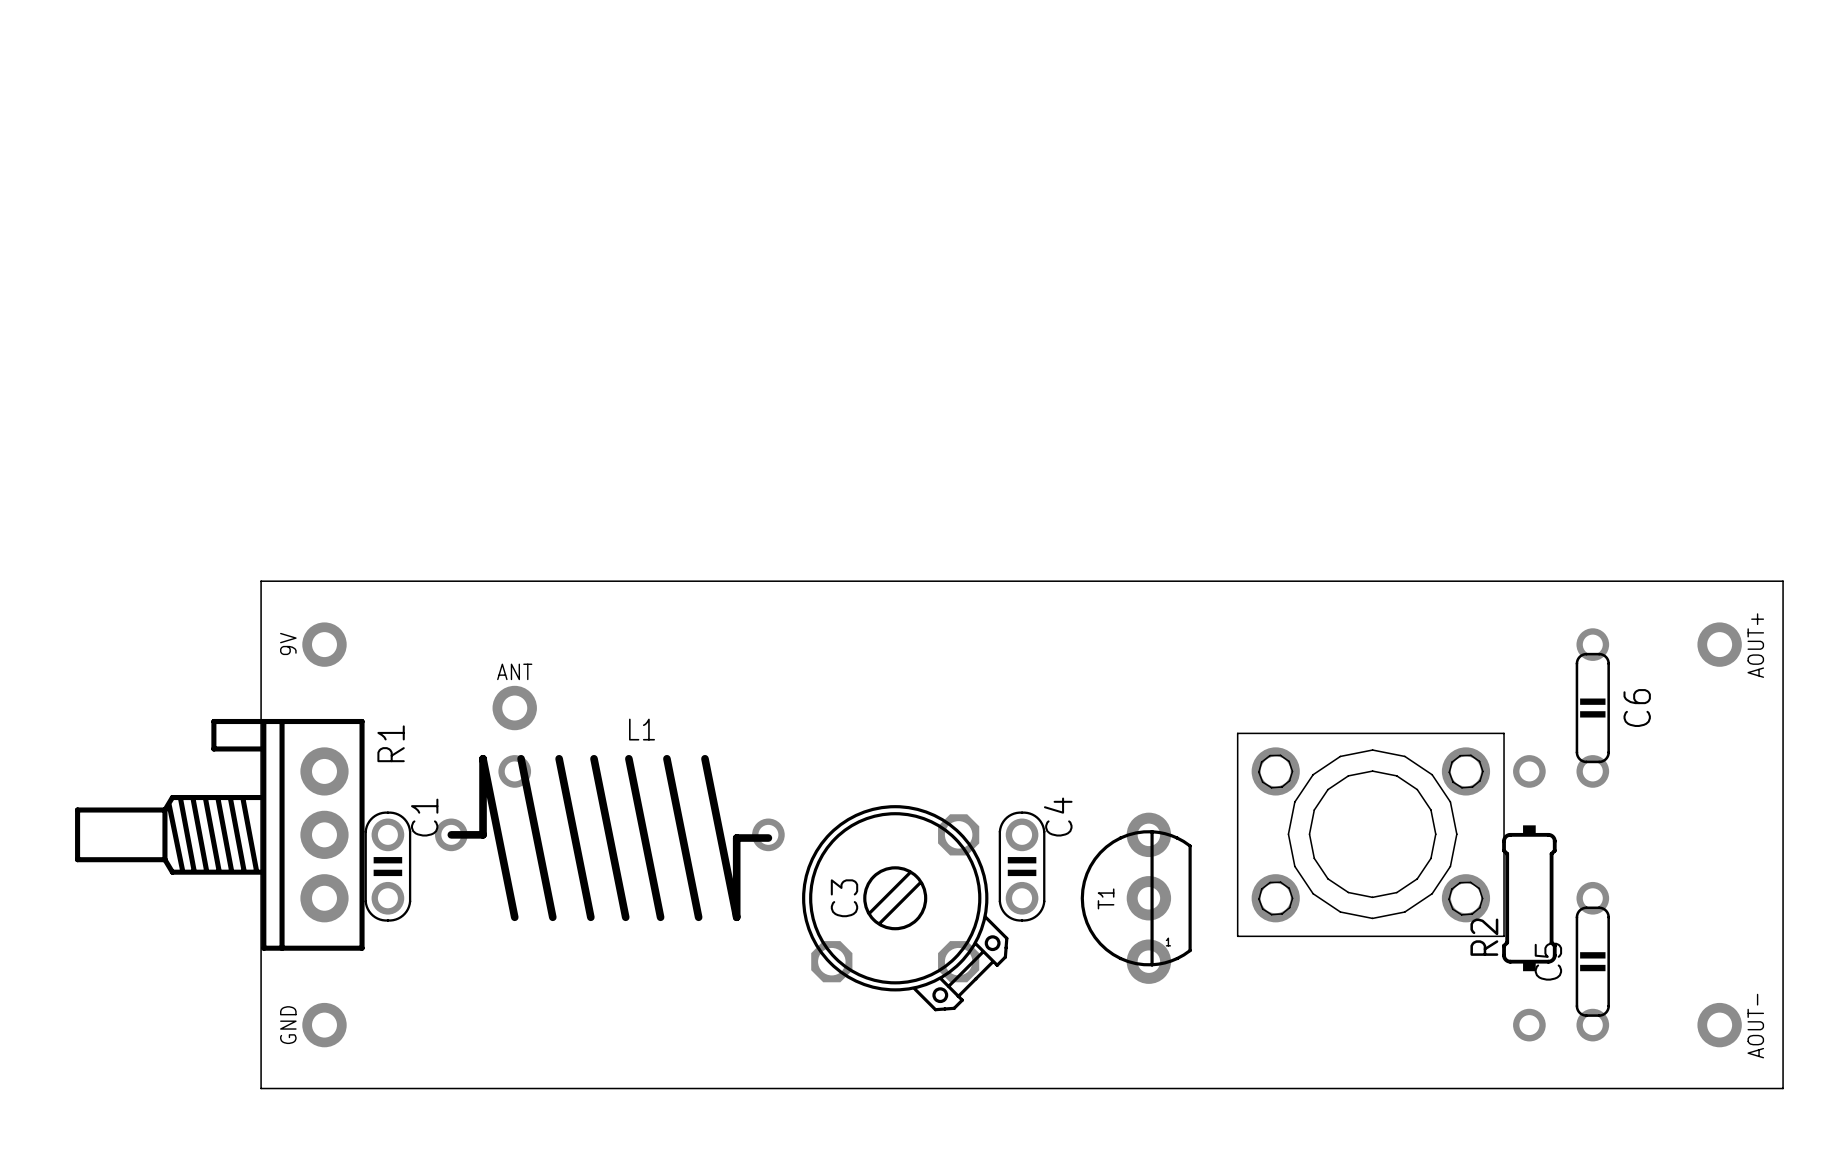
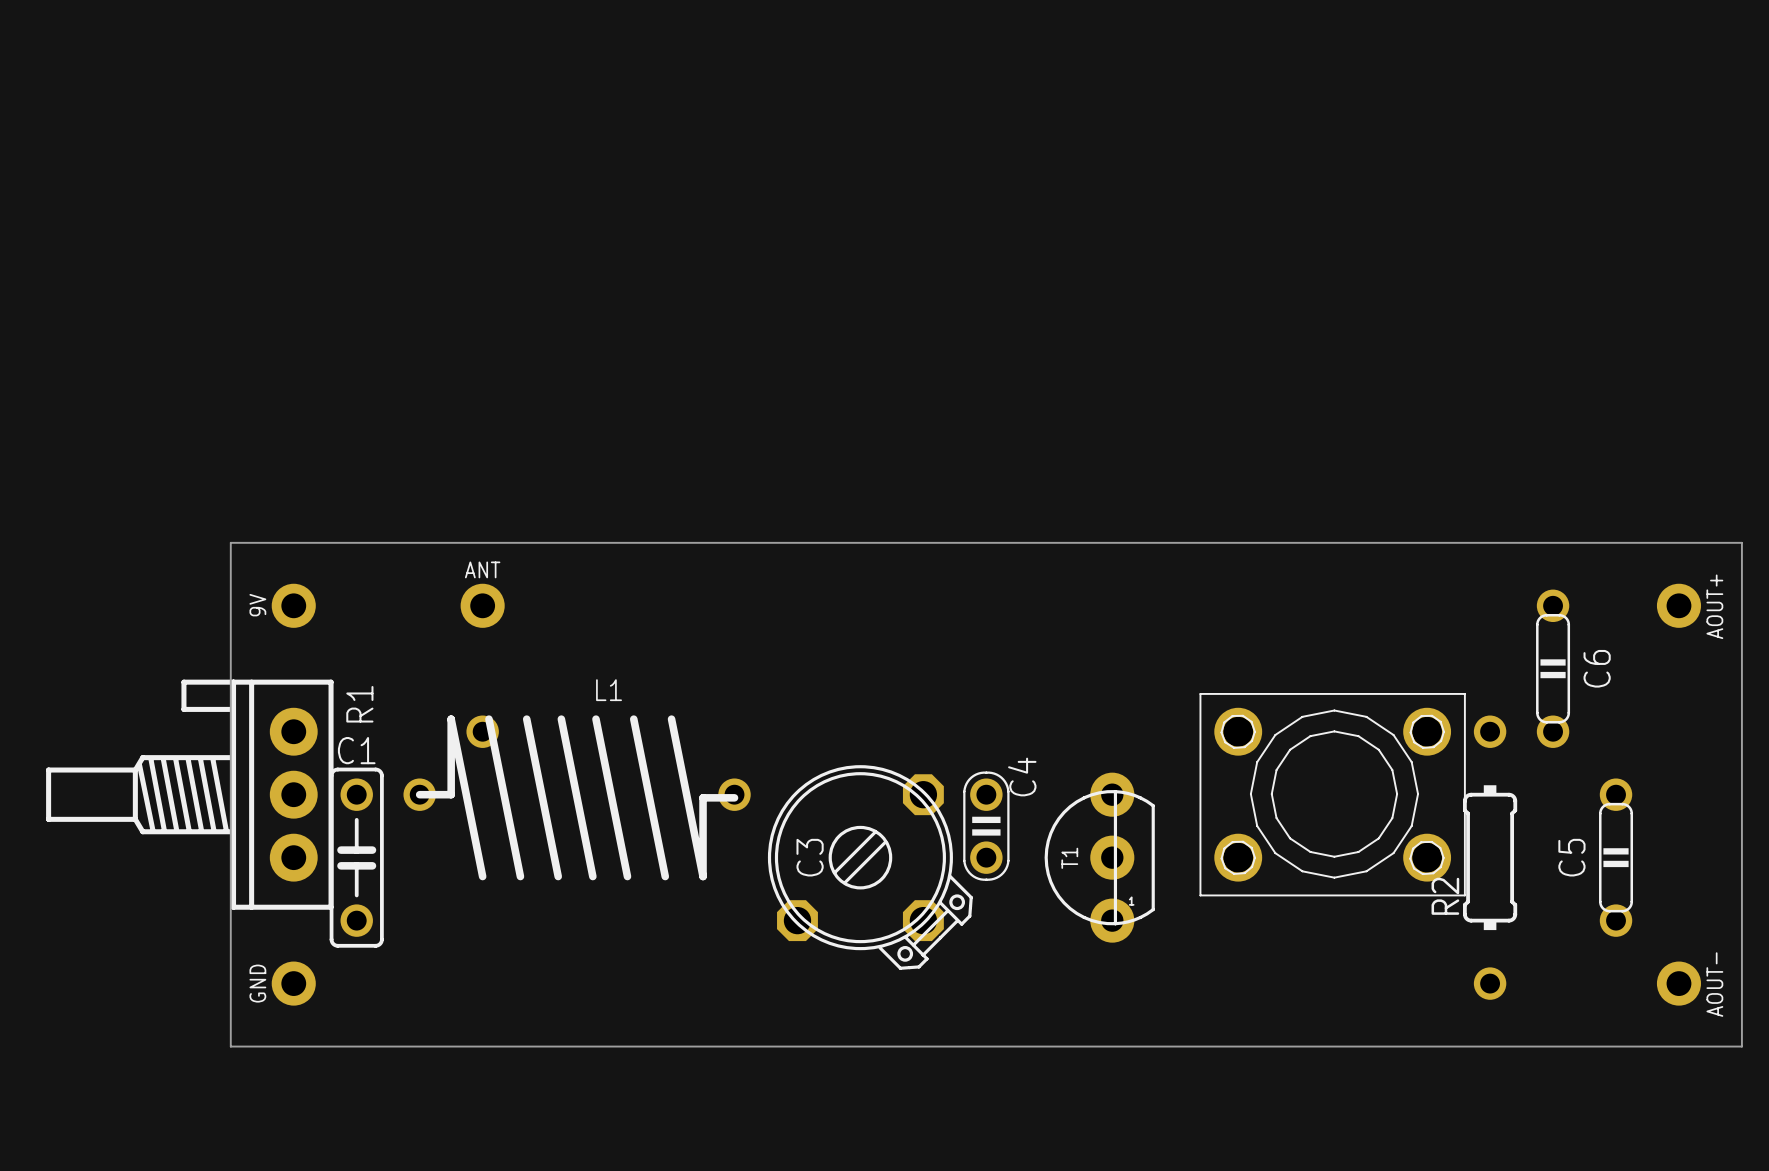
ANT position: (514, 708) -> (482, 605)
C1 footprint: [364, 811, 412, 922] -> [329, 767, 384, 948]
C1 name position: C1 (424, 817) -> C1 (356, 750)
C5 position: (1592, 961) -> (1616, 857)

